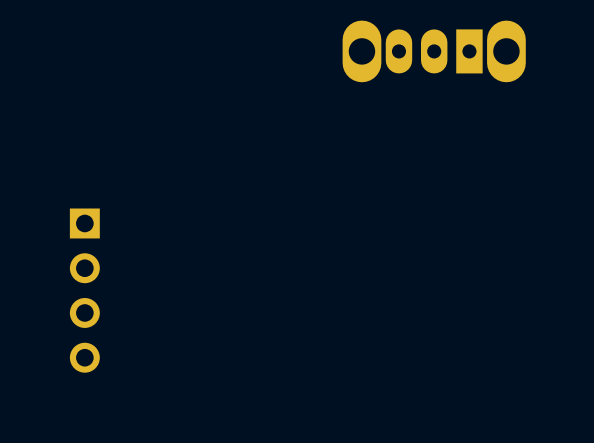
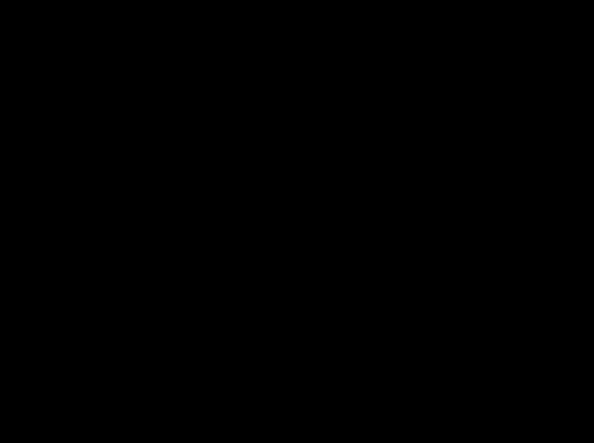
part: (434, 51) -> none
part: (84, 290) -> none

